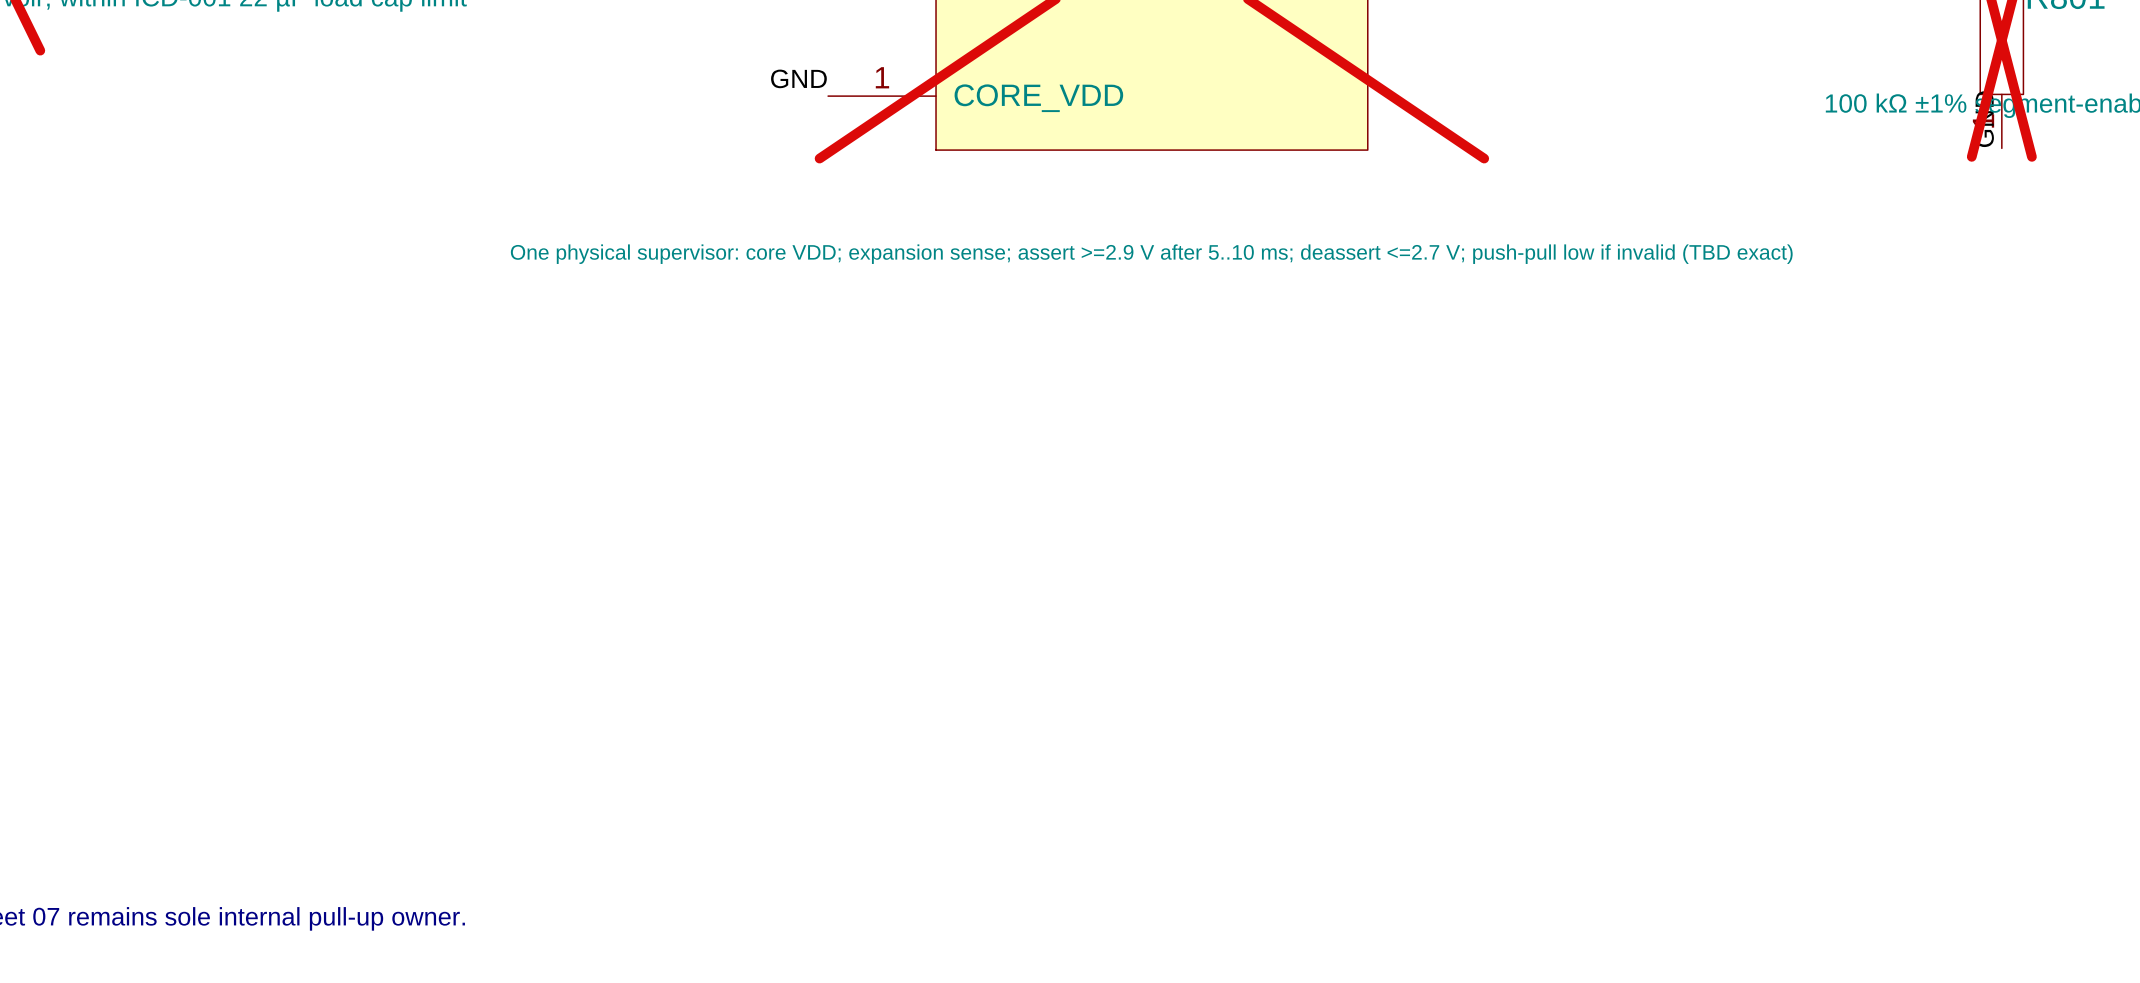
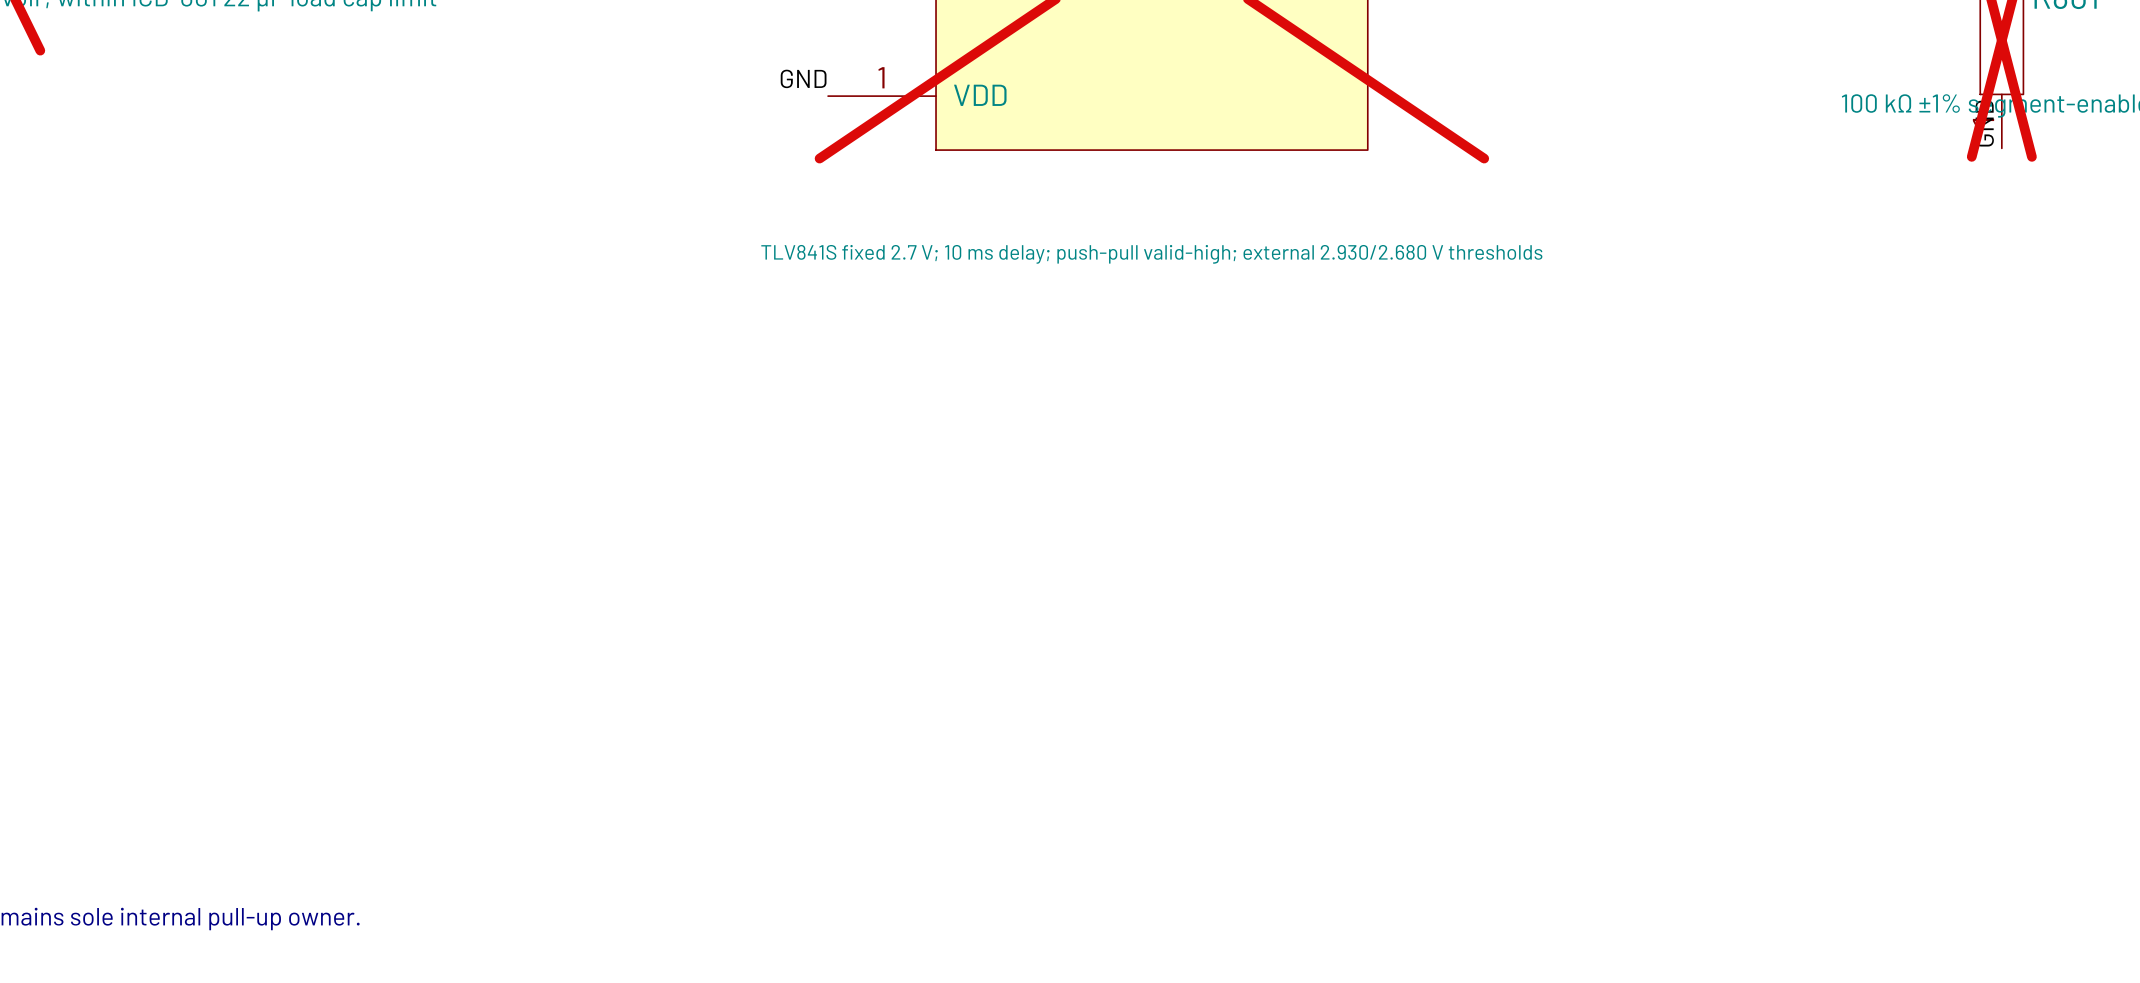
part pin name: CORE_VDD (1038, 98) -> VDD (980, 95)
part value: One physical supervisor: core VDD; expansion sense; assert >=2.9 V after 5..10 ms; deassert <=2.7 V; push-pull low if invalid (TBD exact) (1151, 254) -> TLV841S fixed 2.7 V; 10 ms delay; push-pull valid-high; external 2.930/2.680 V thresholds (1151, 254)

